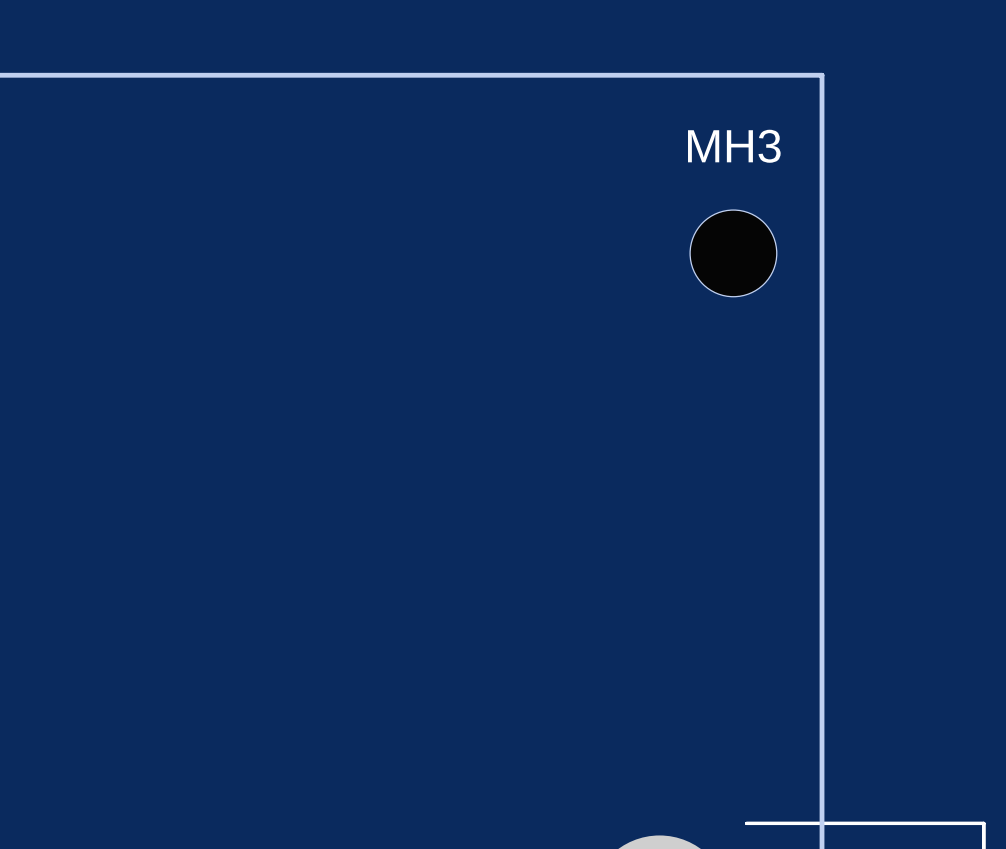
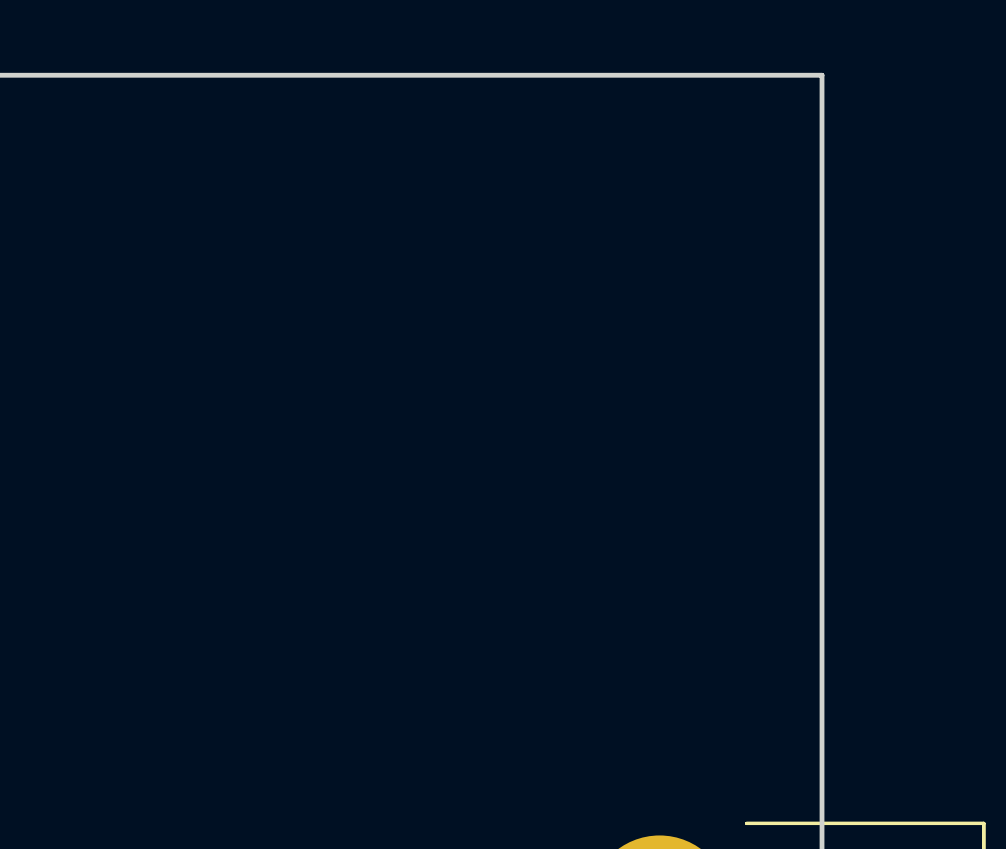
MH3: (733, 253) -> none

